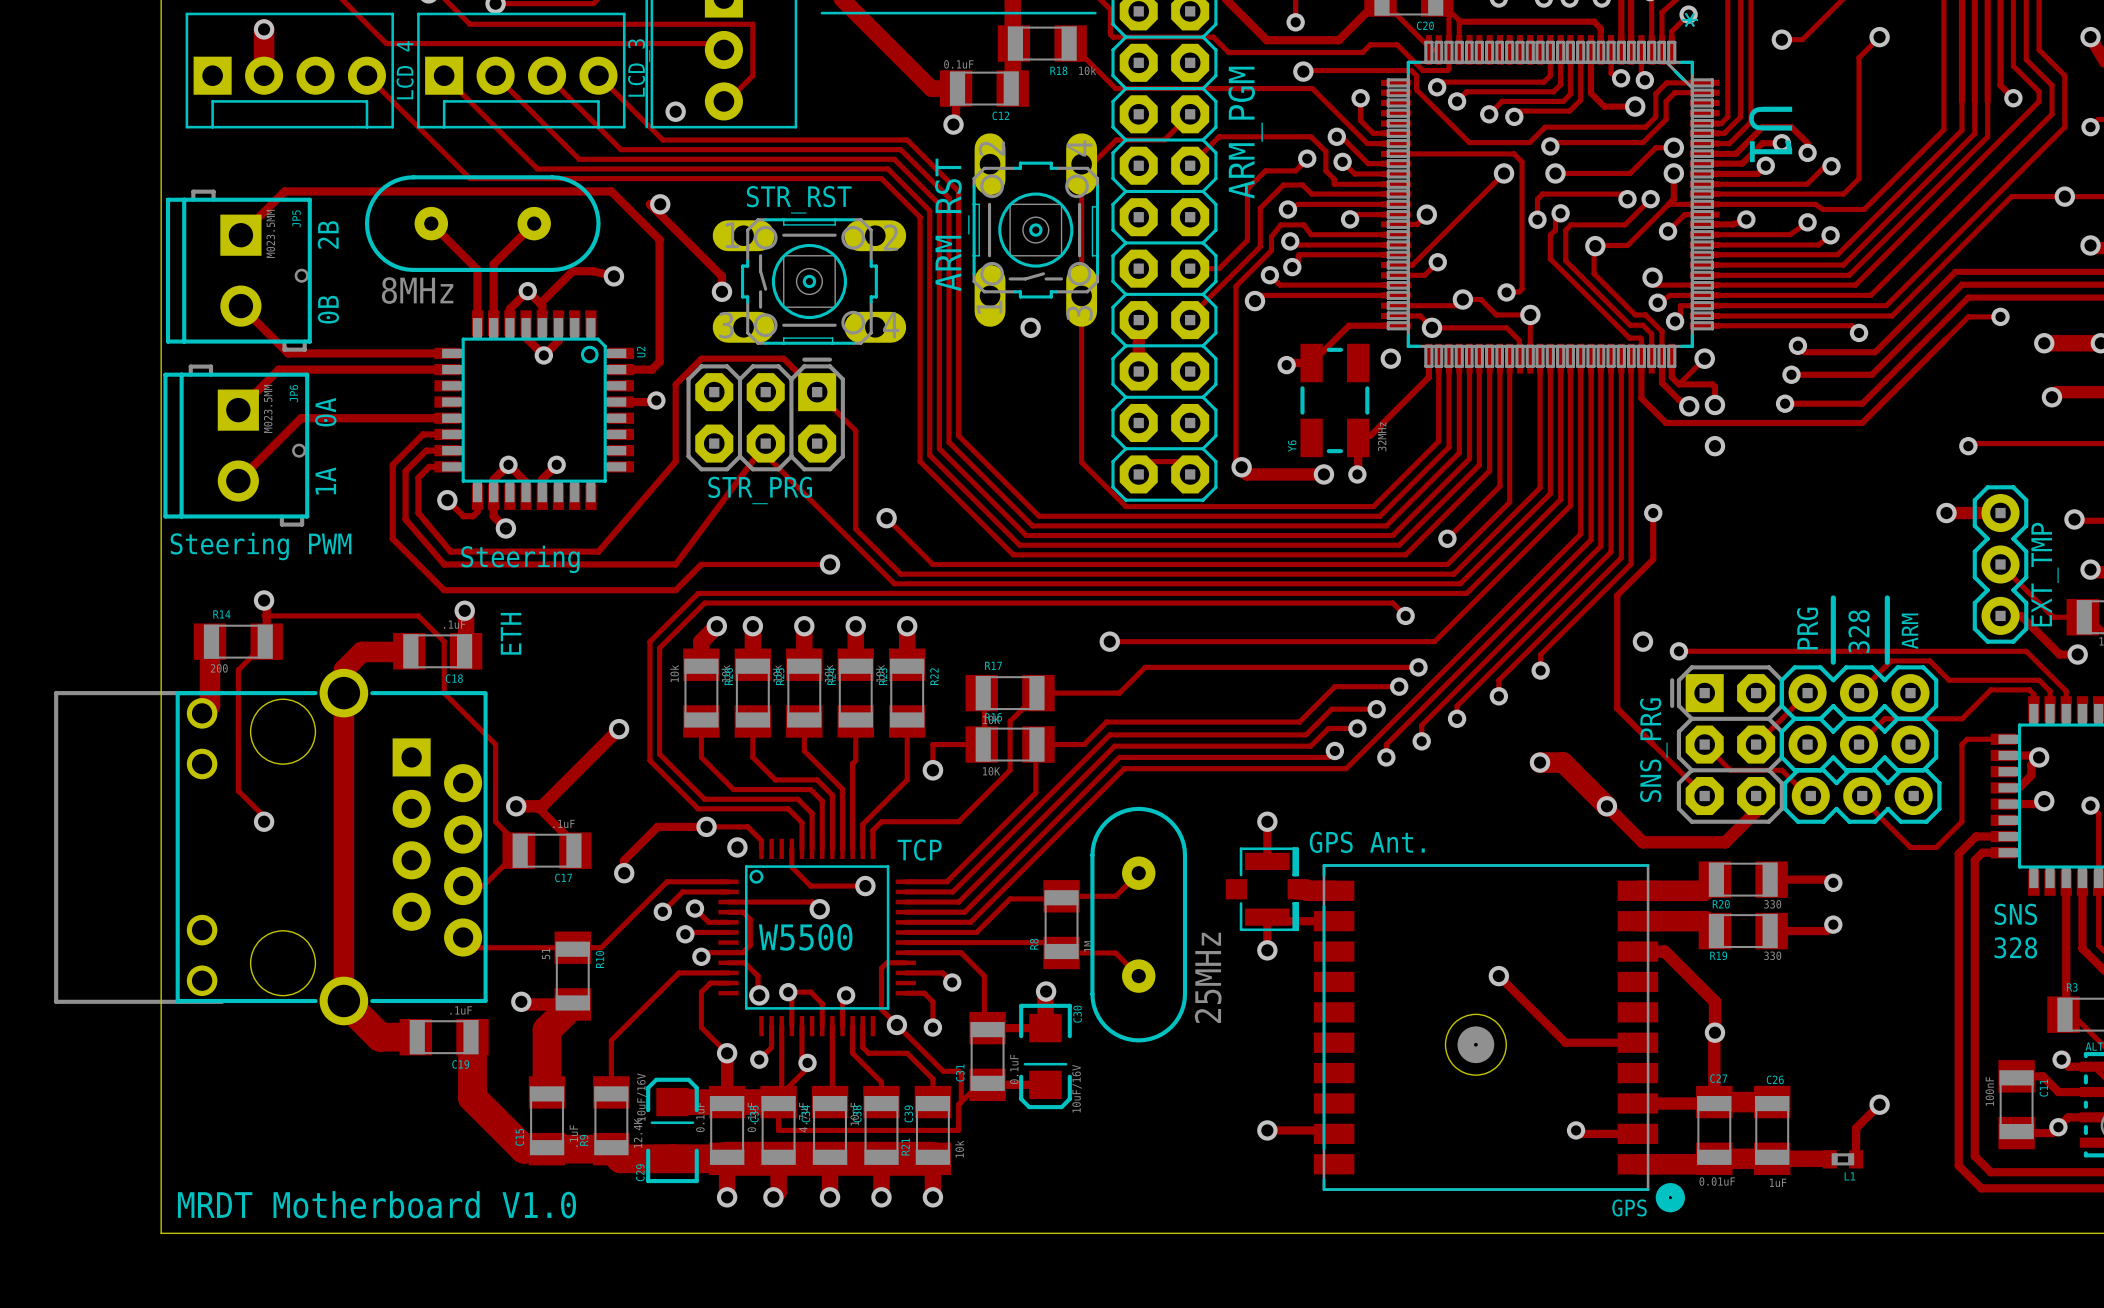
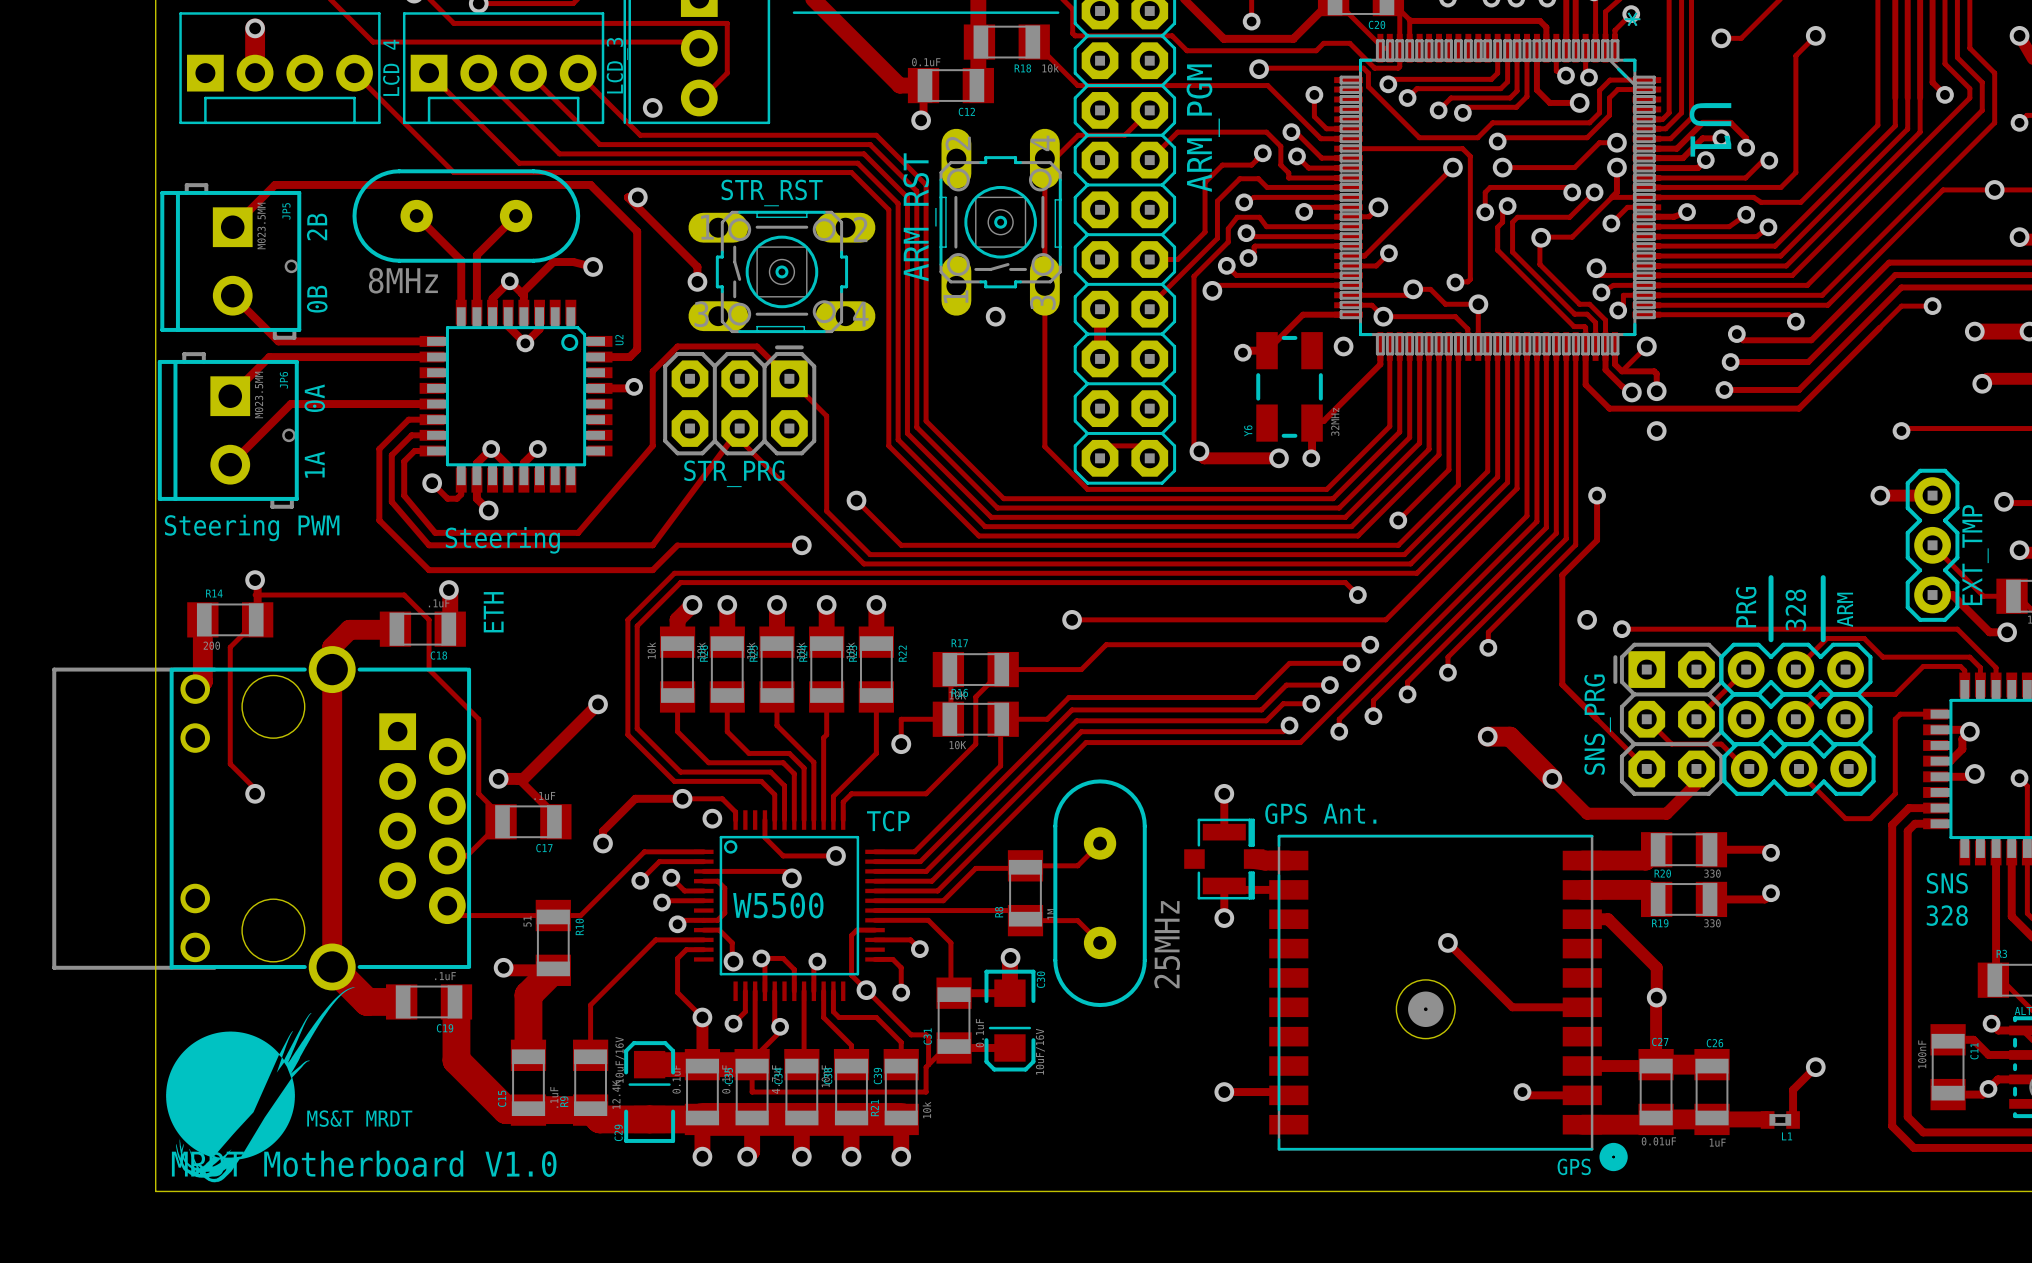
drawing: none -> [166, 987, 356, 1183]
text: none -> MS&T MRDT (359, 1118)

